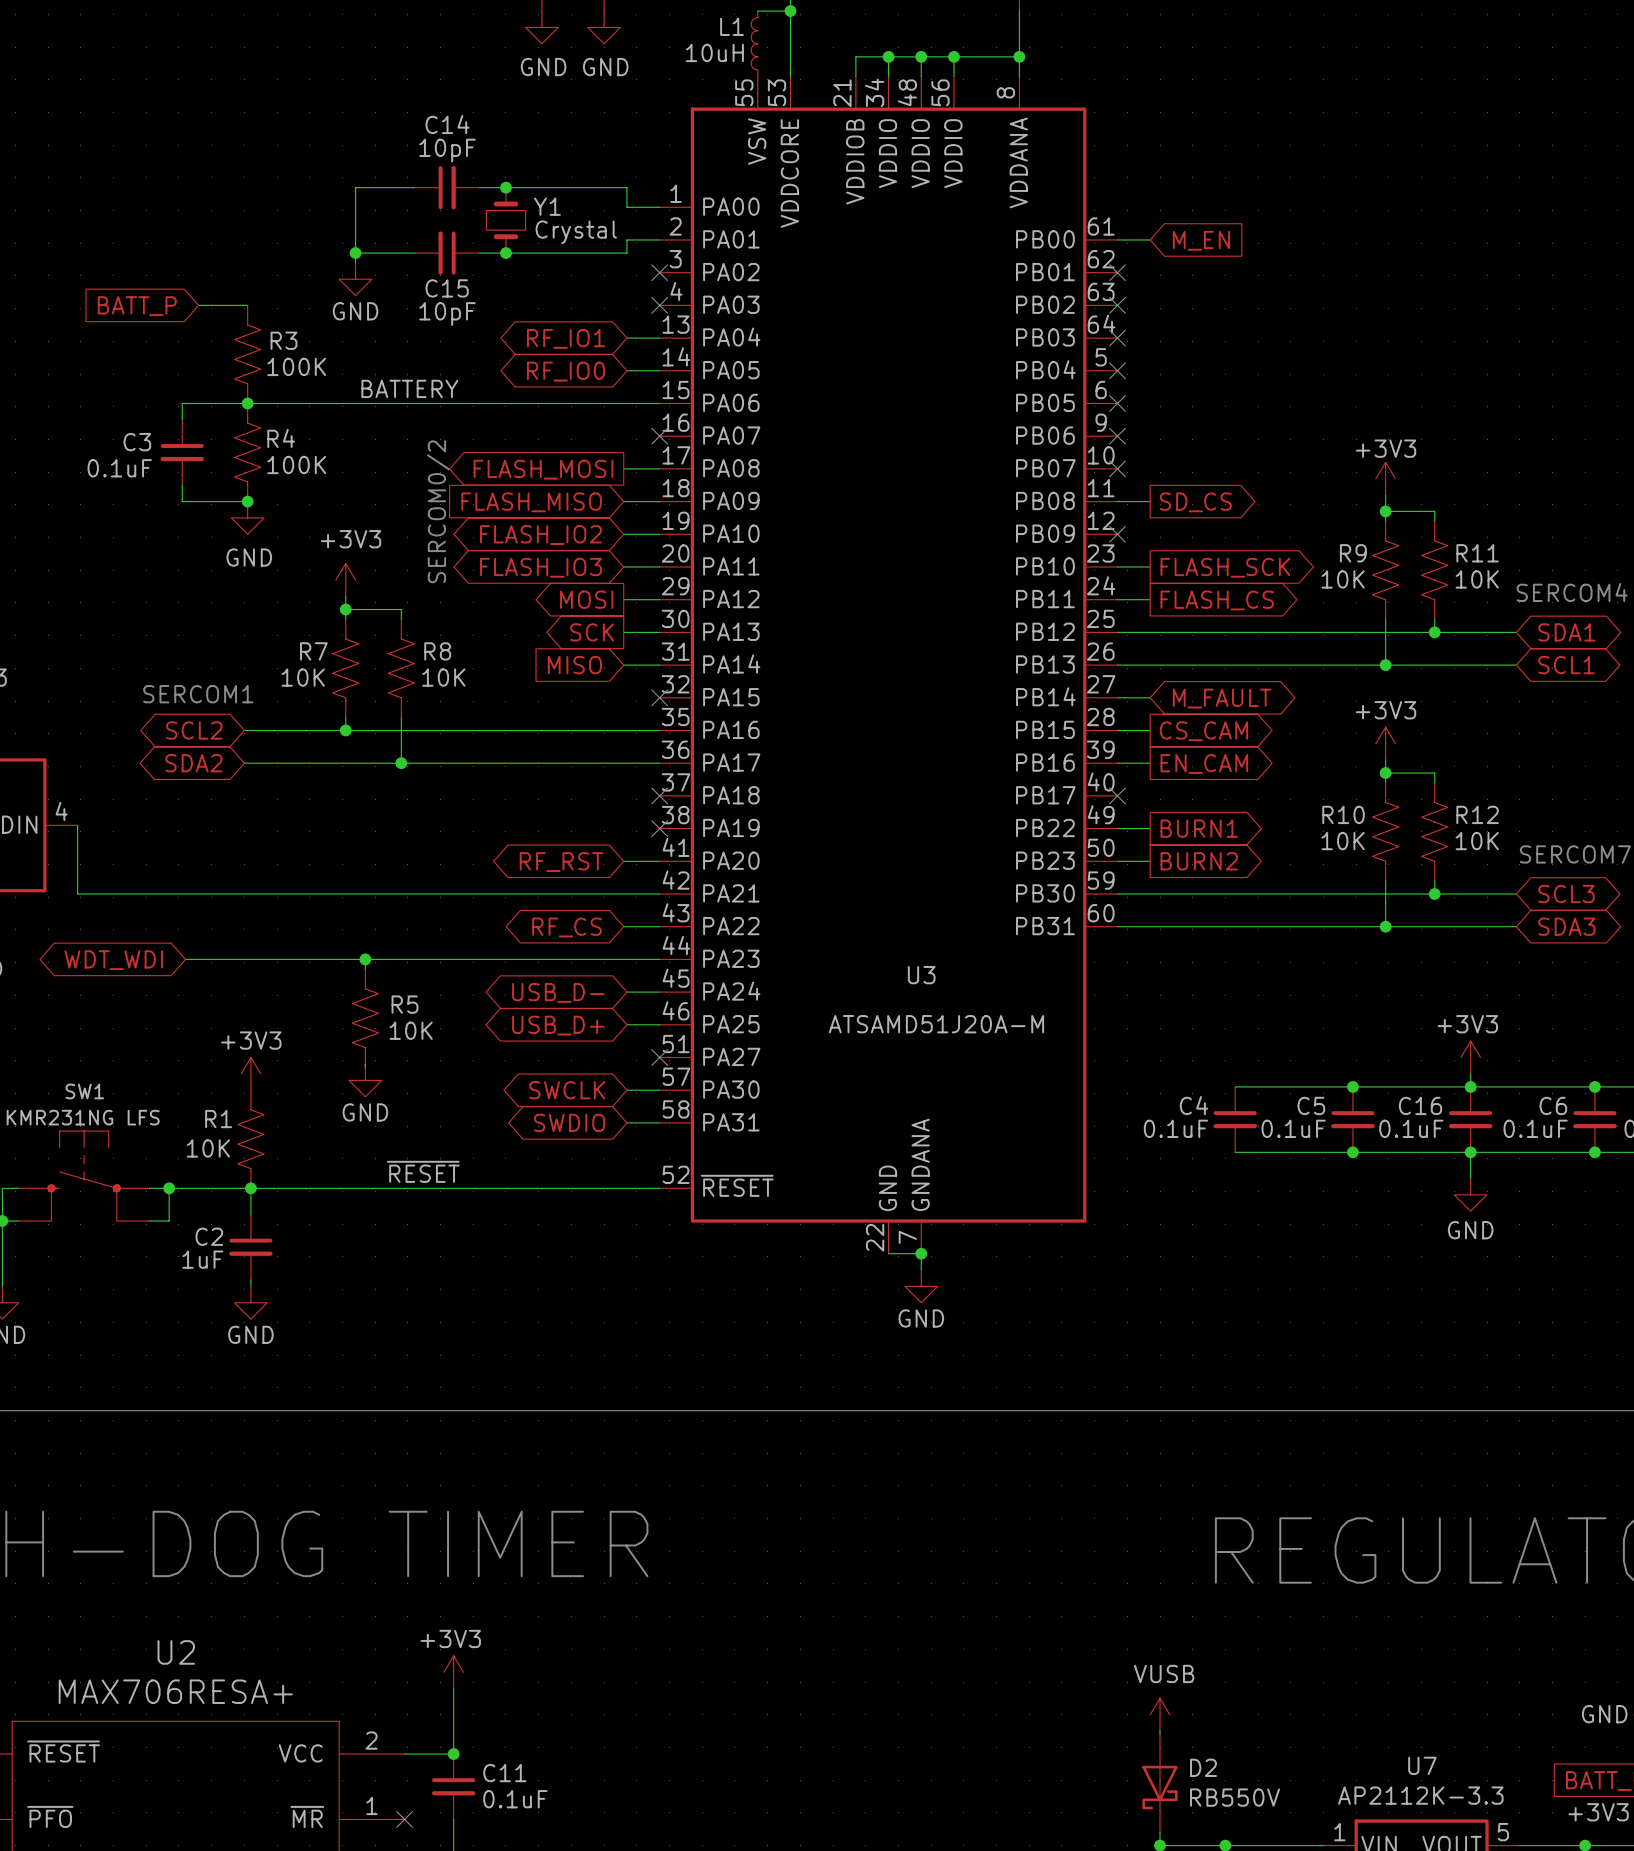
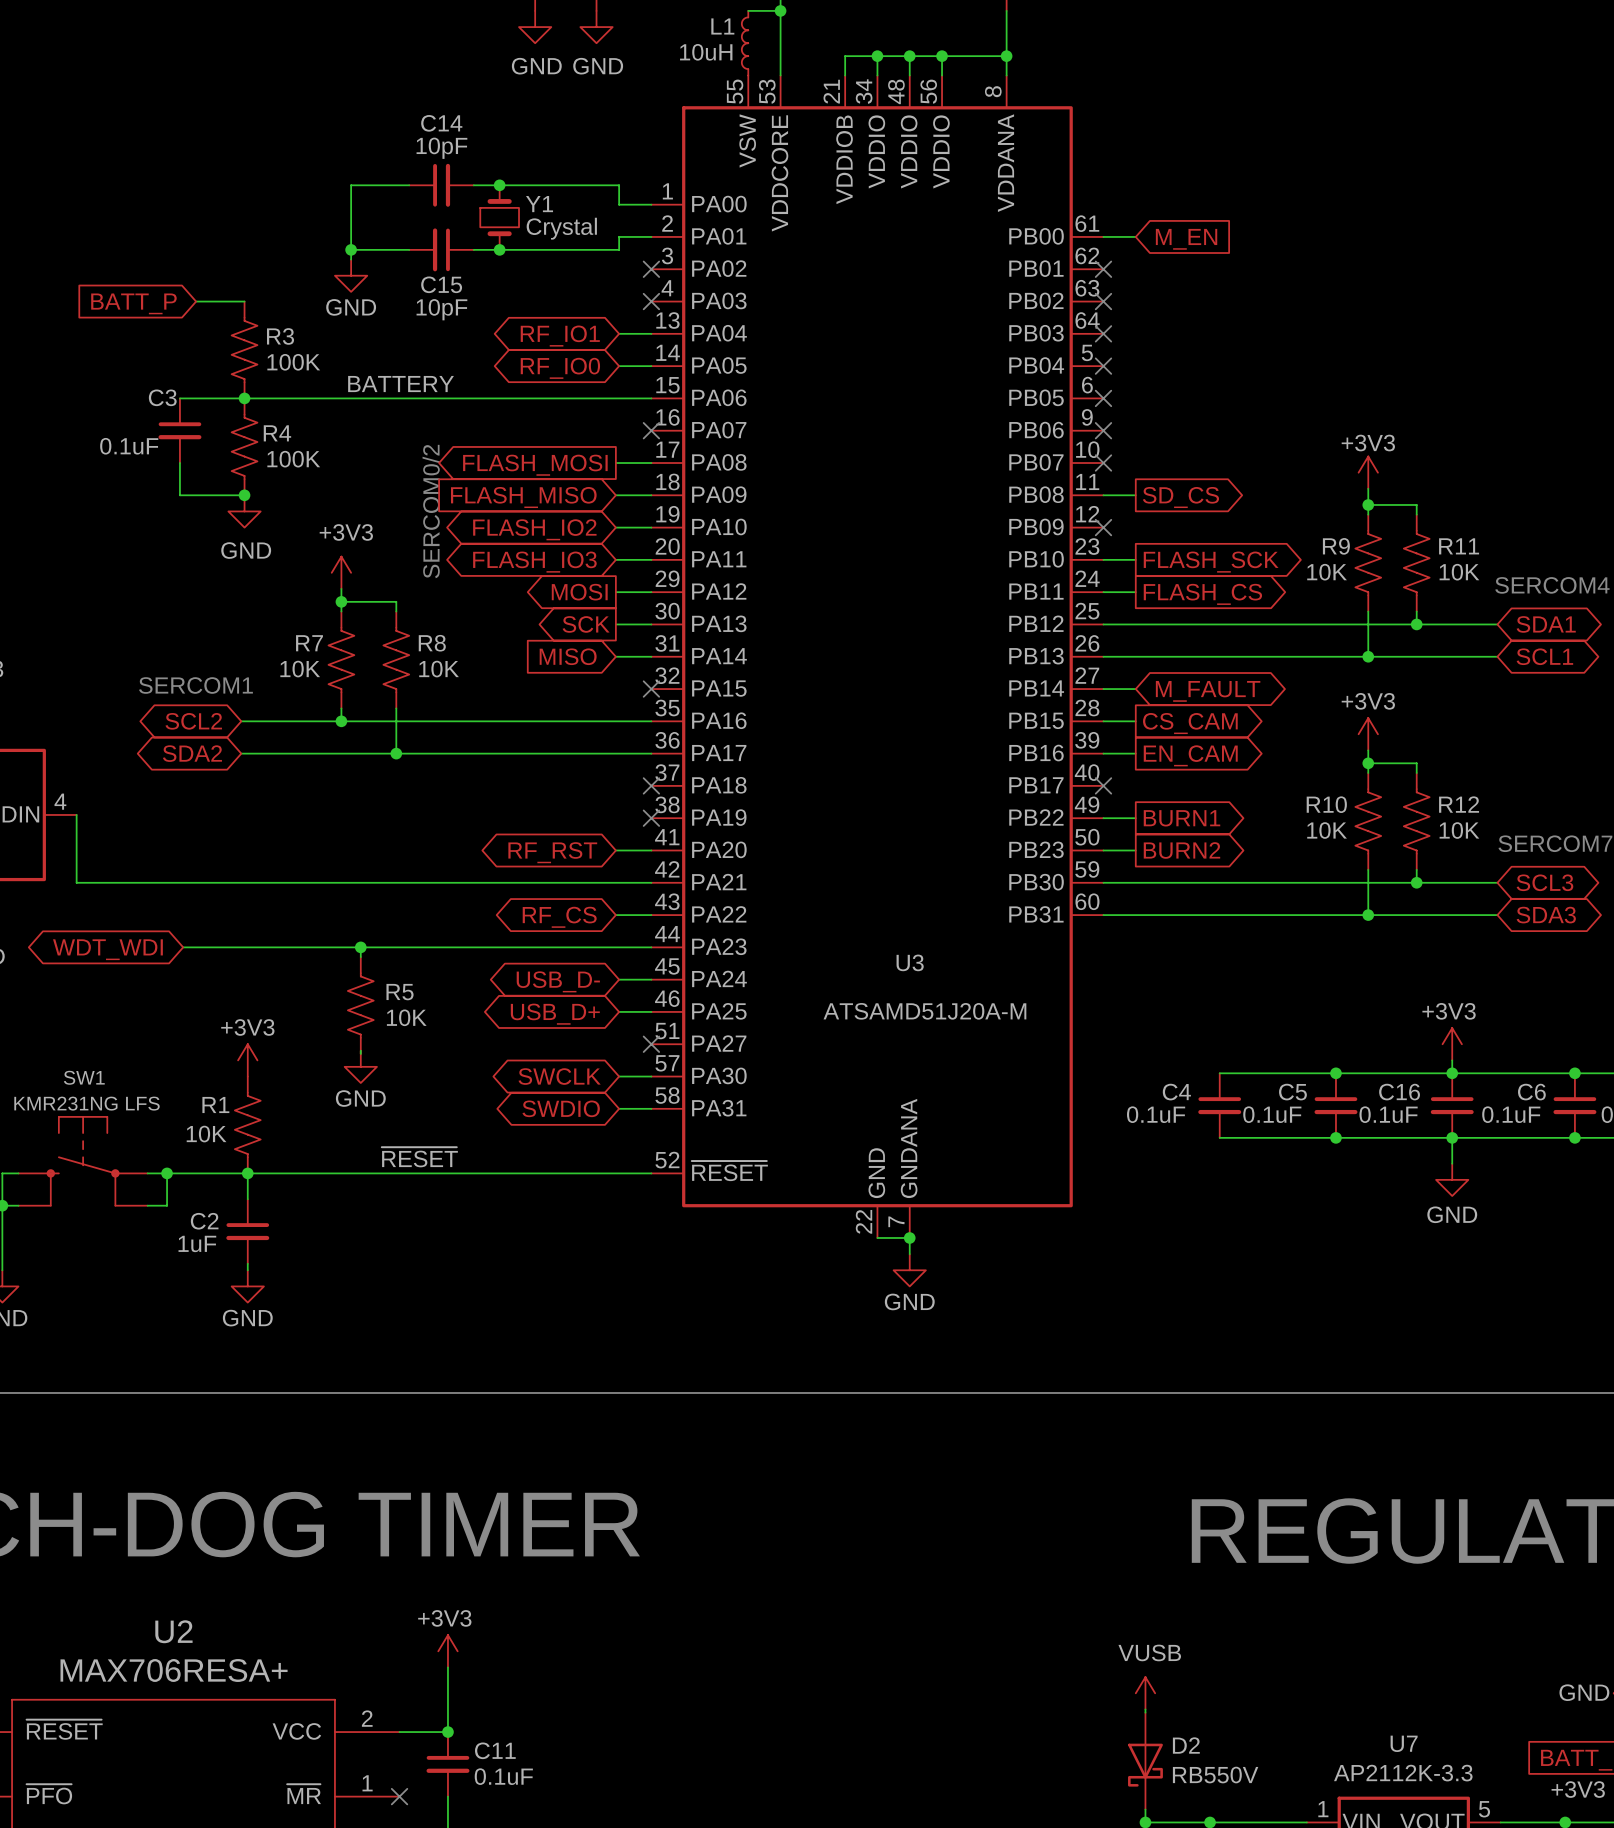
C3 name position: C3 (137, 442) -> C3 (162, 397)
C3 position: (182, 452) -> (179, 430)
C3 value position: 0.1uF (119, 468) -> 0.1uF (129, 446)

